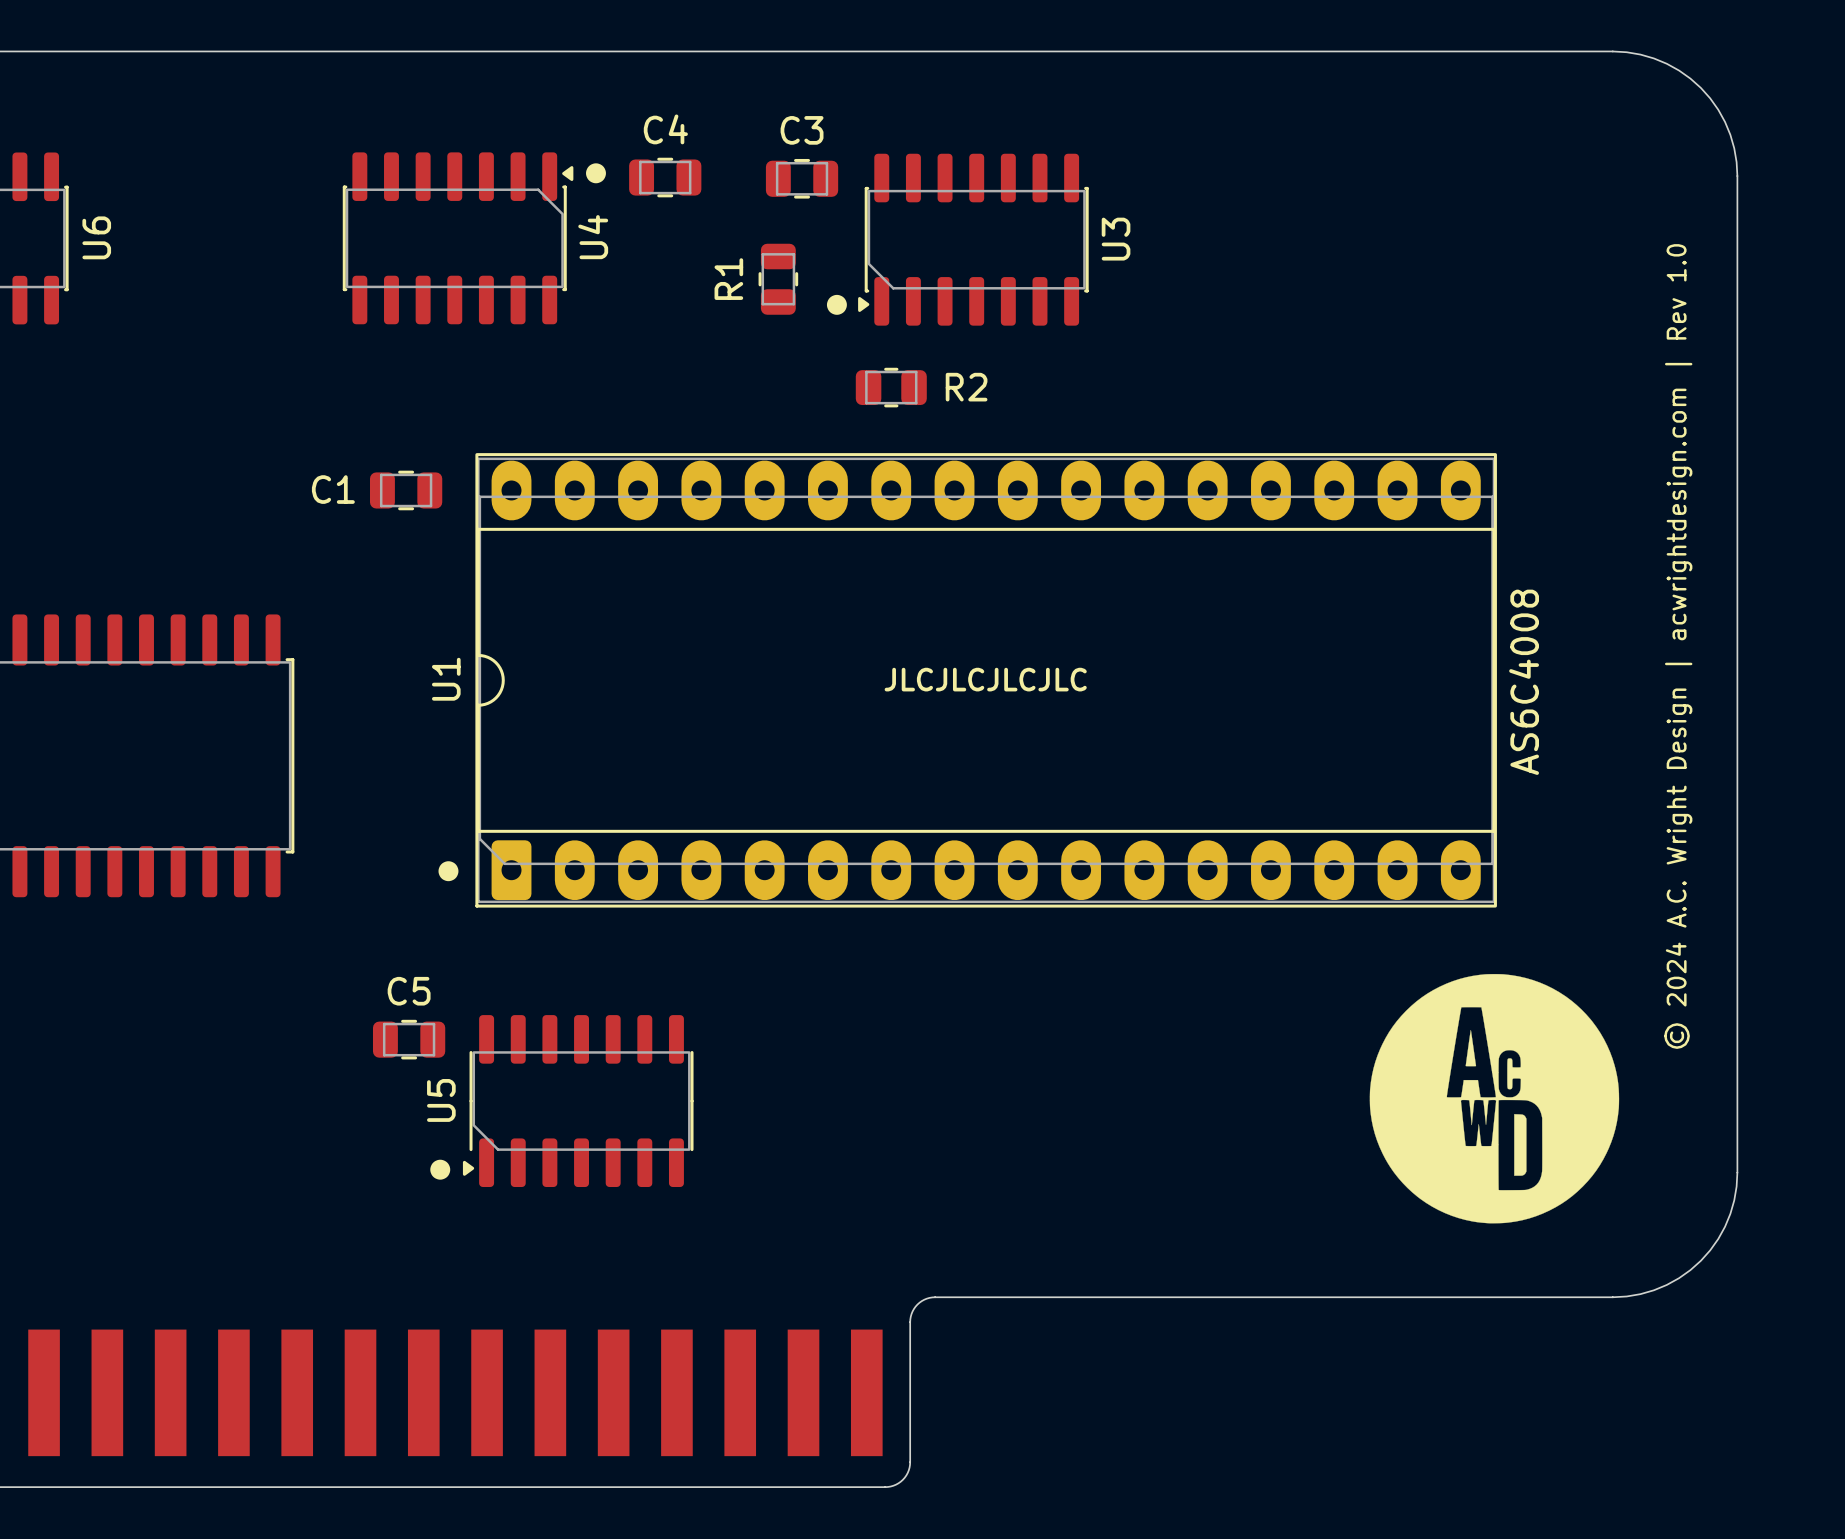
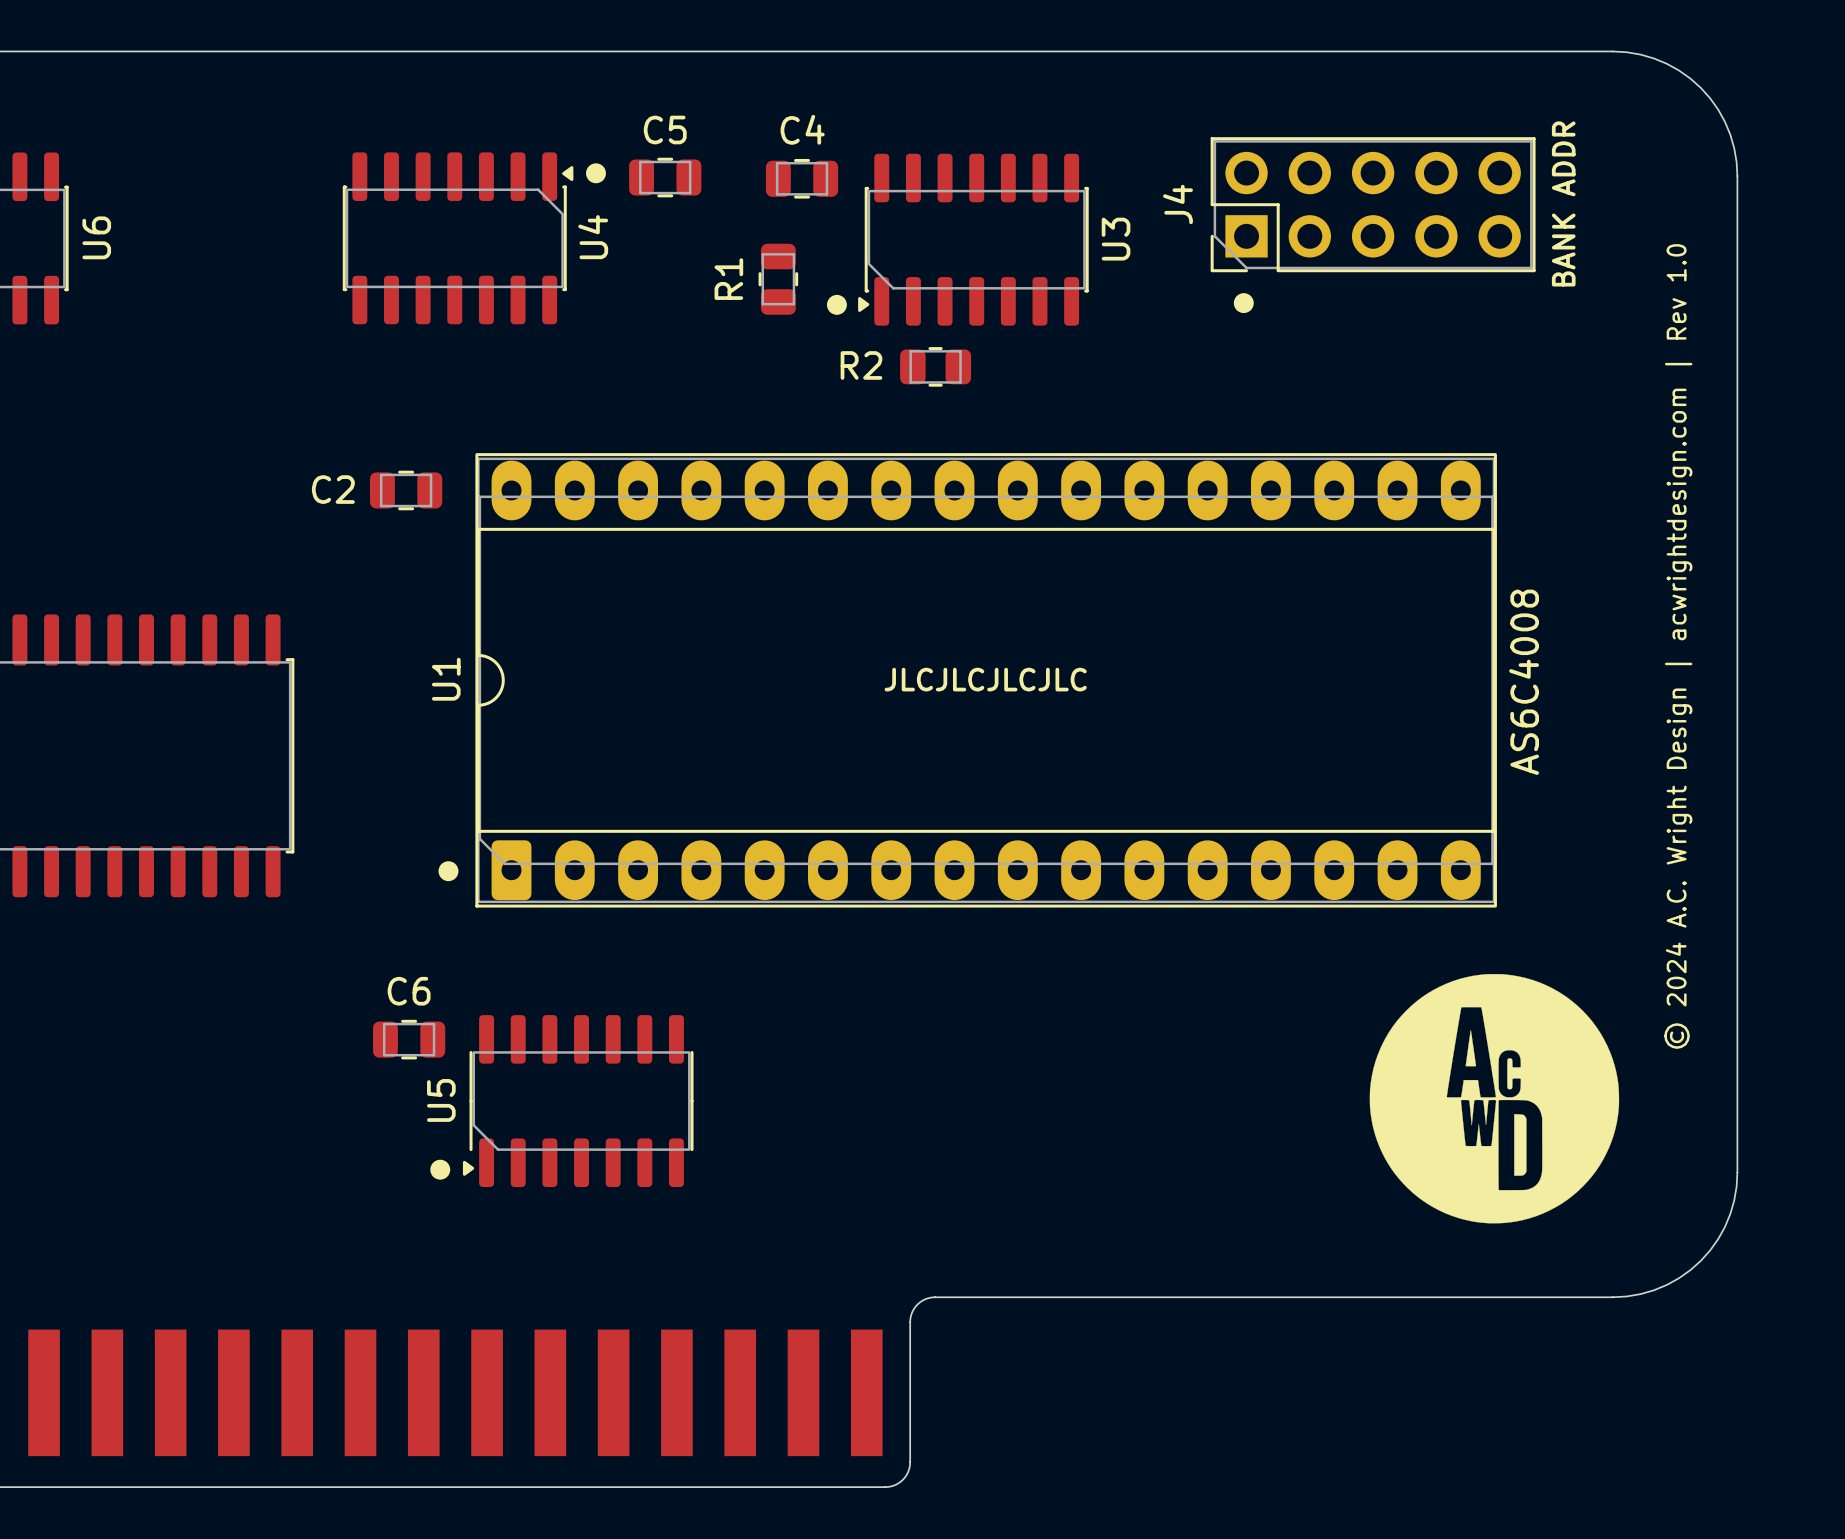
C4 name: C4 (665, 129) -> C5 (665, 130)
C3 name: C3 (802, 130) -> C4 (802, 129)
J4: none -> BANK ADDR (1373, 204)
drawing: none -> [1233, 293, 1254, 314]
R2 position: (891, 387) -> (935, 366)
R2 name position: R2 (966, 387) -> R2 (861, 365)
C1 name: C1 (333, 489) -> C2 (333, 489)
C5 name: C5 (409, 991) -> C6 (409, 991)

